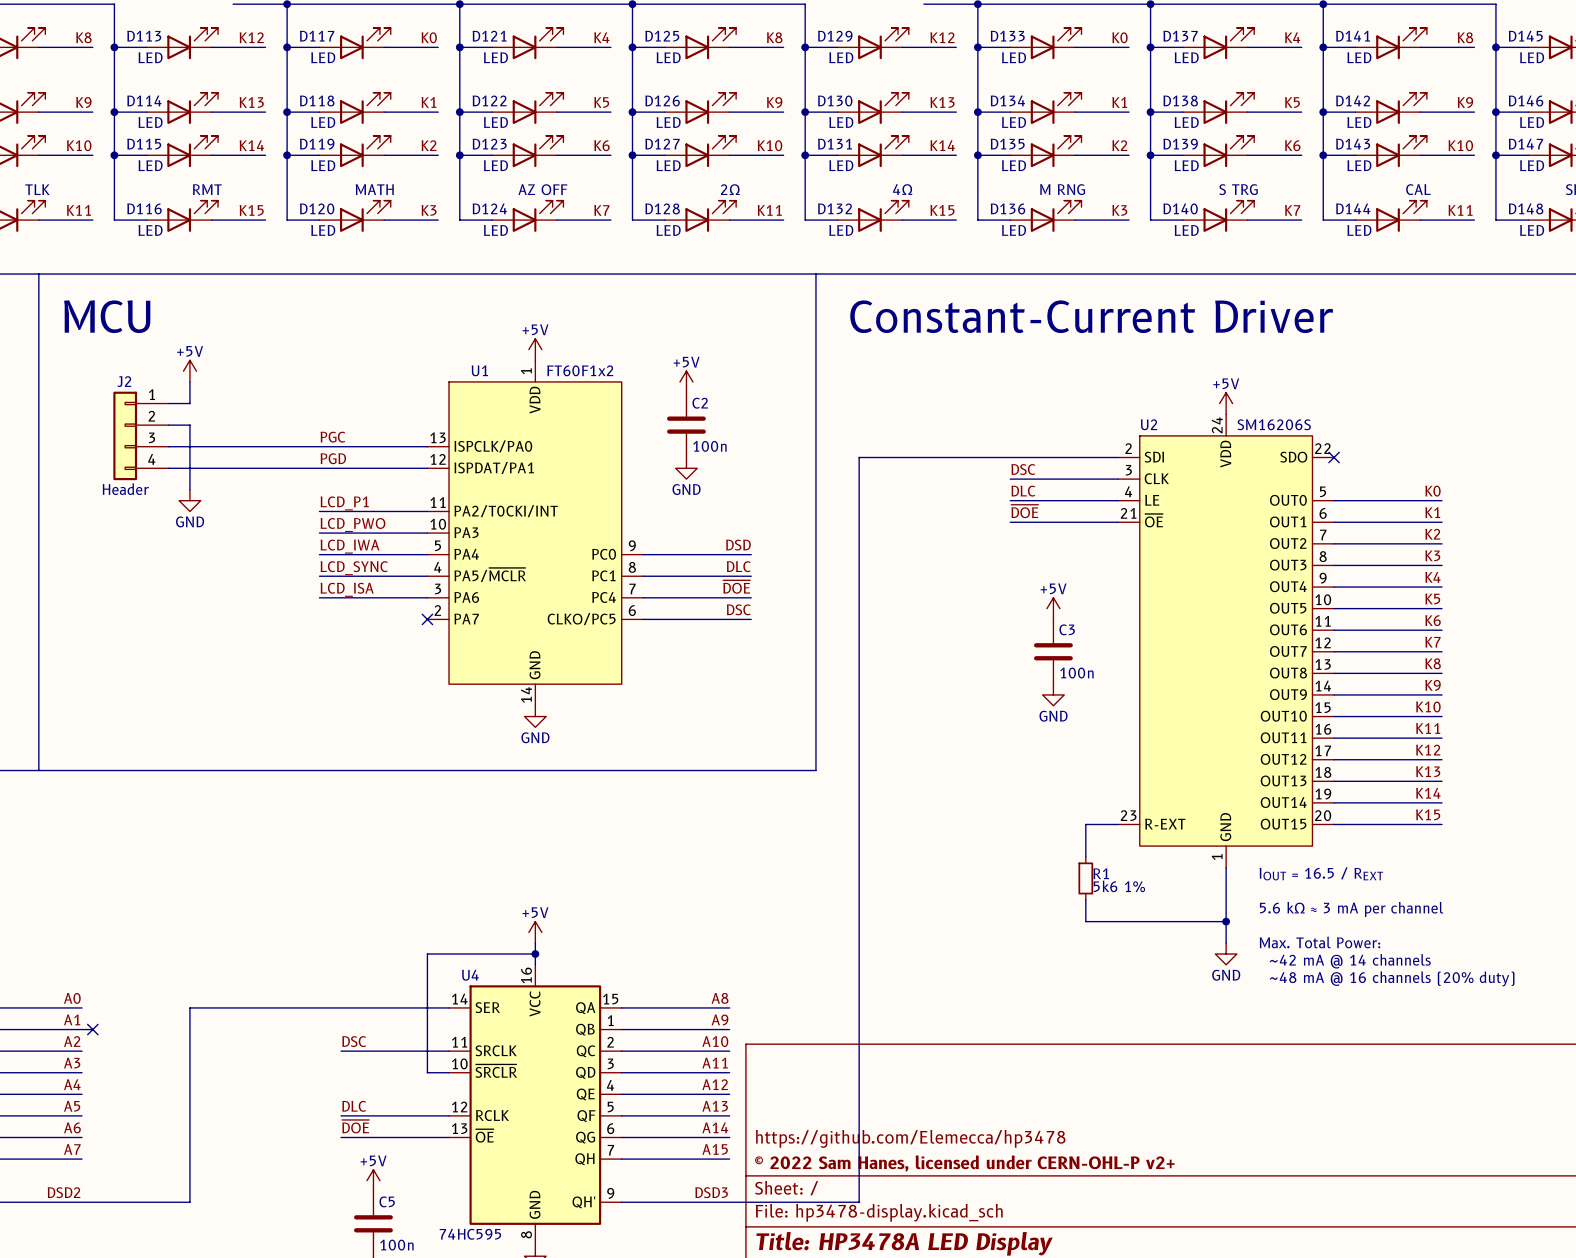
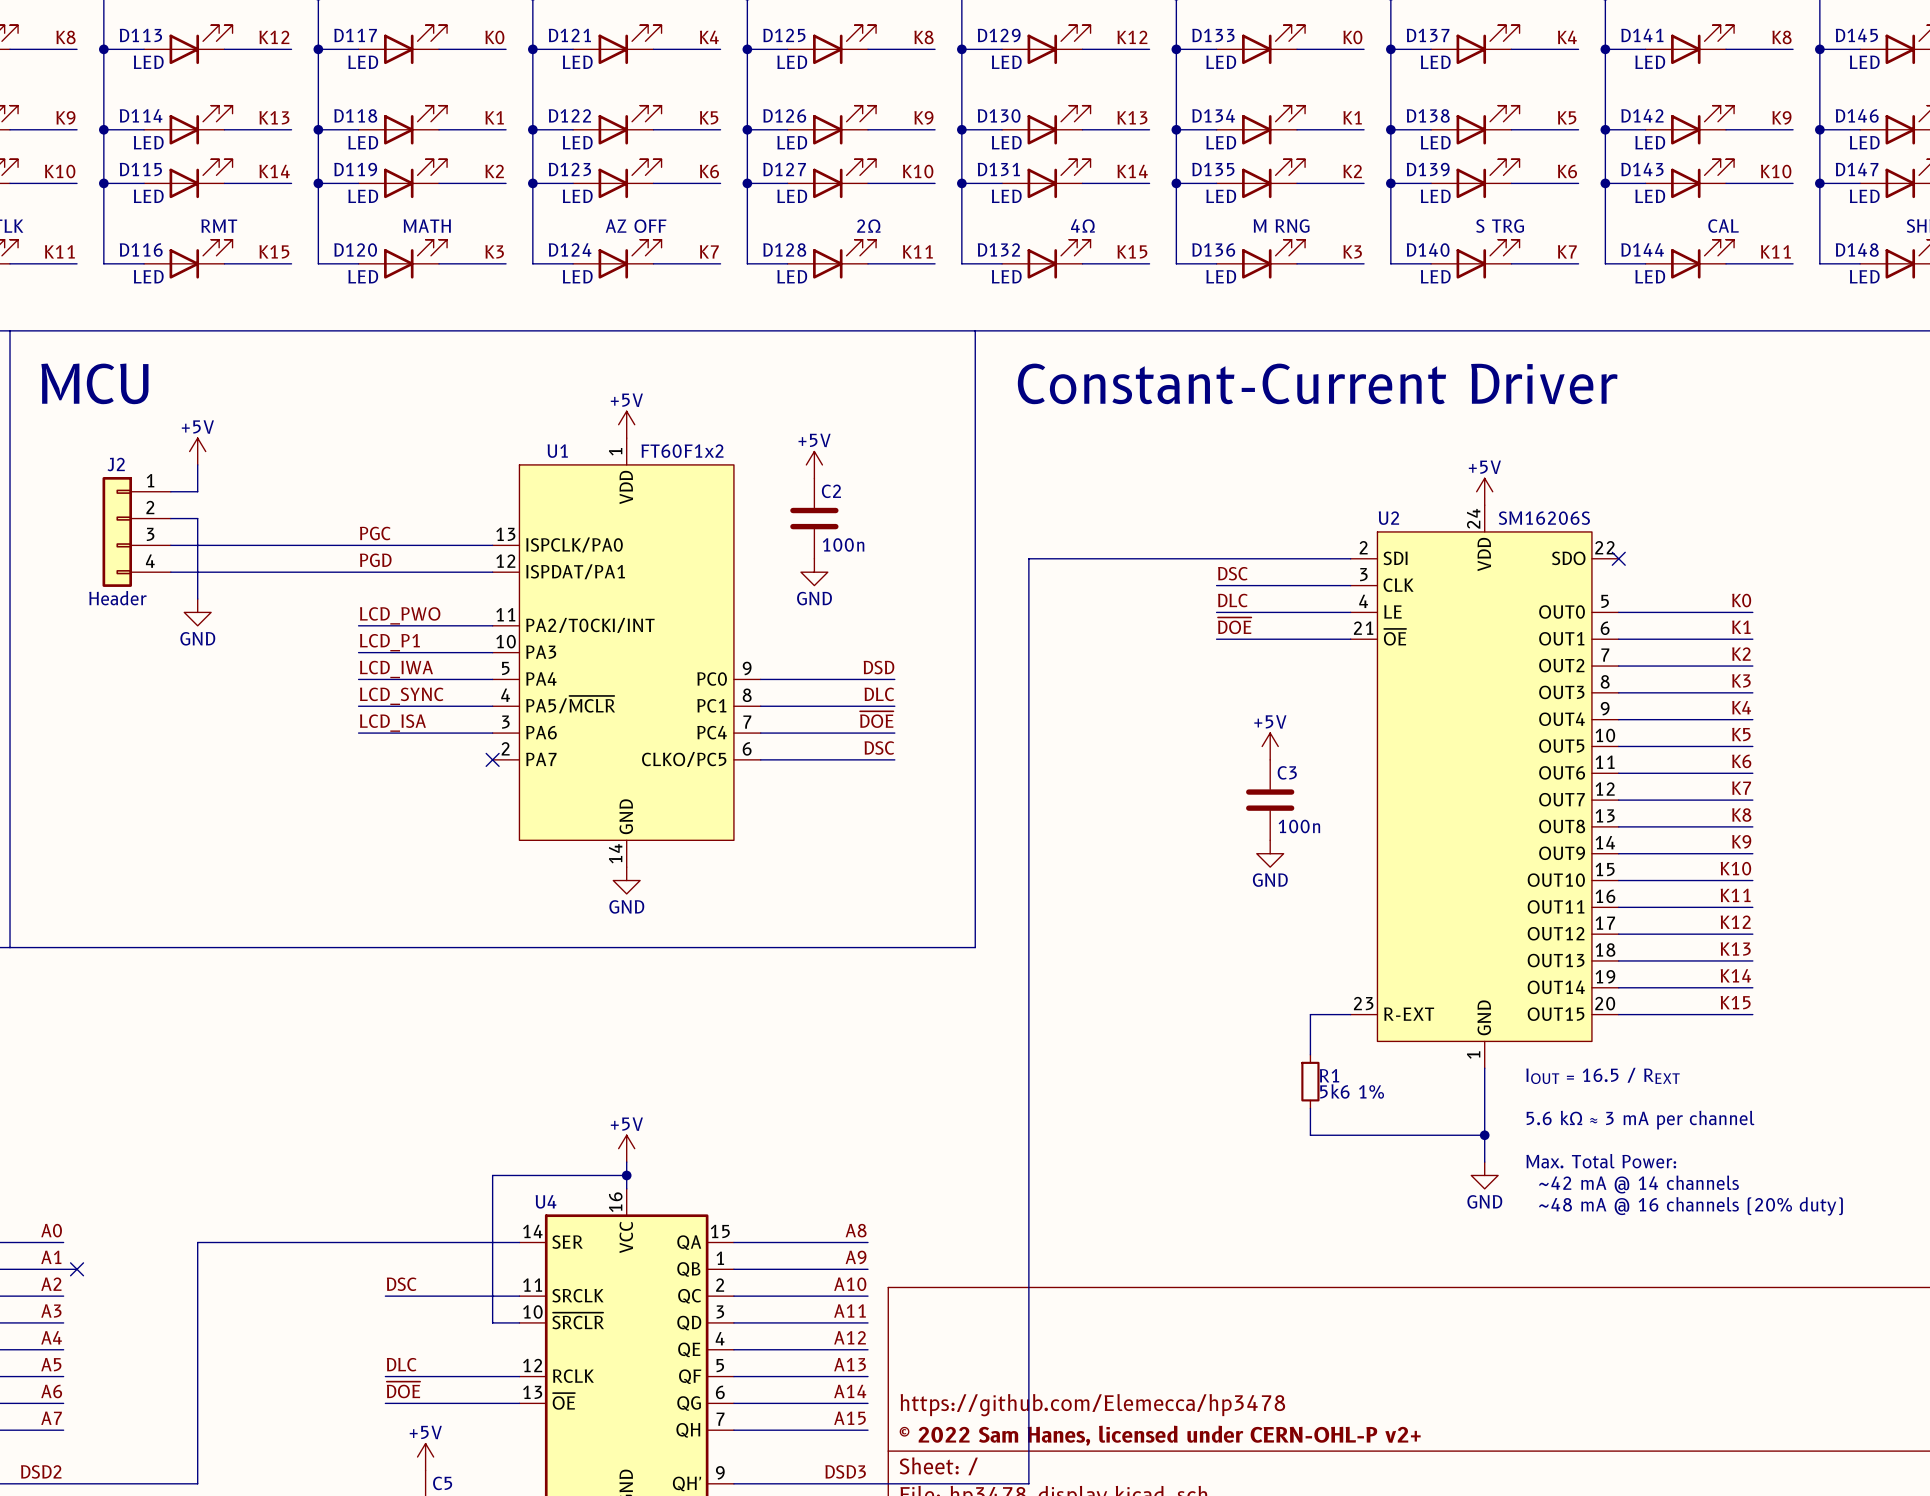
label: LCD_P1 (344, 503) -> LCD_PWO (400, 615)
label: LCD_PWO (352, 525) -> LCD_P1 (389, 642)

